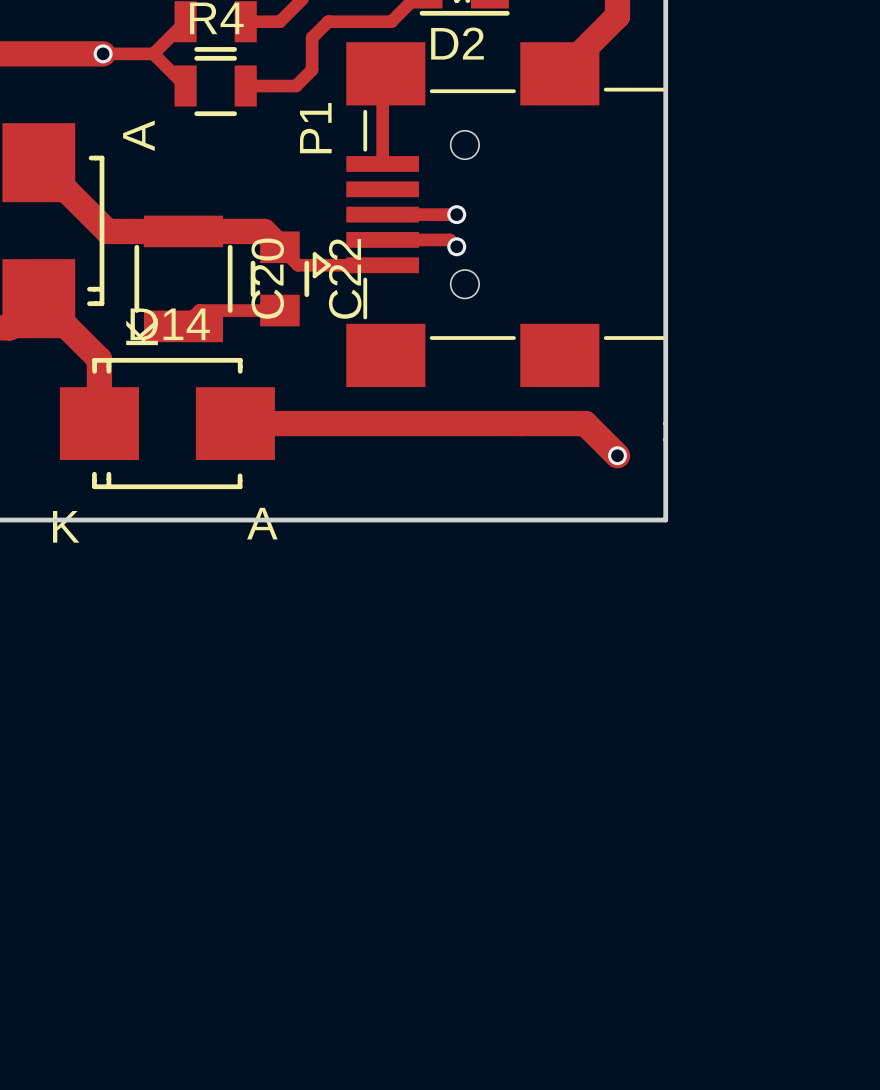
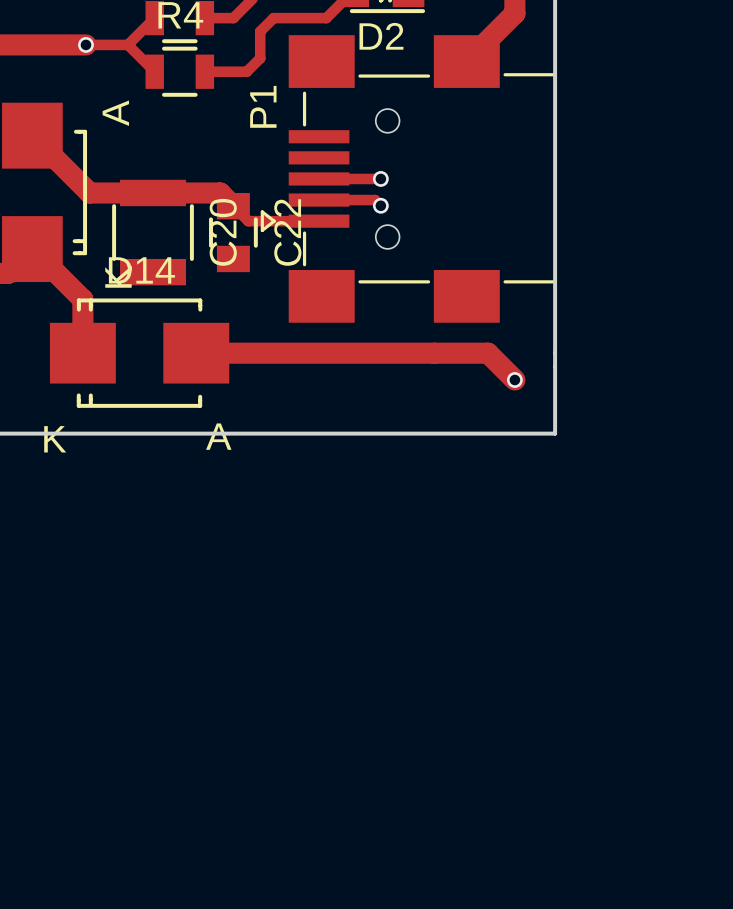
track: (385, 73) (382, 76) (382, 163) -> none
track: (279, 310) (199, 310) (183, 326) -> none

